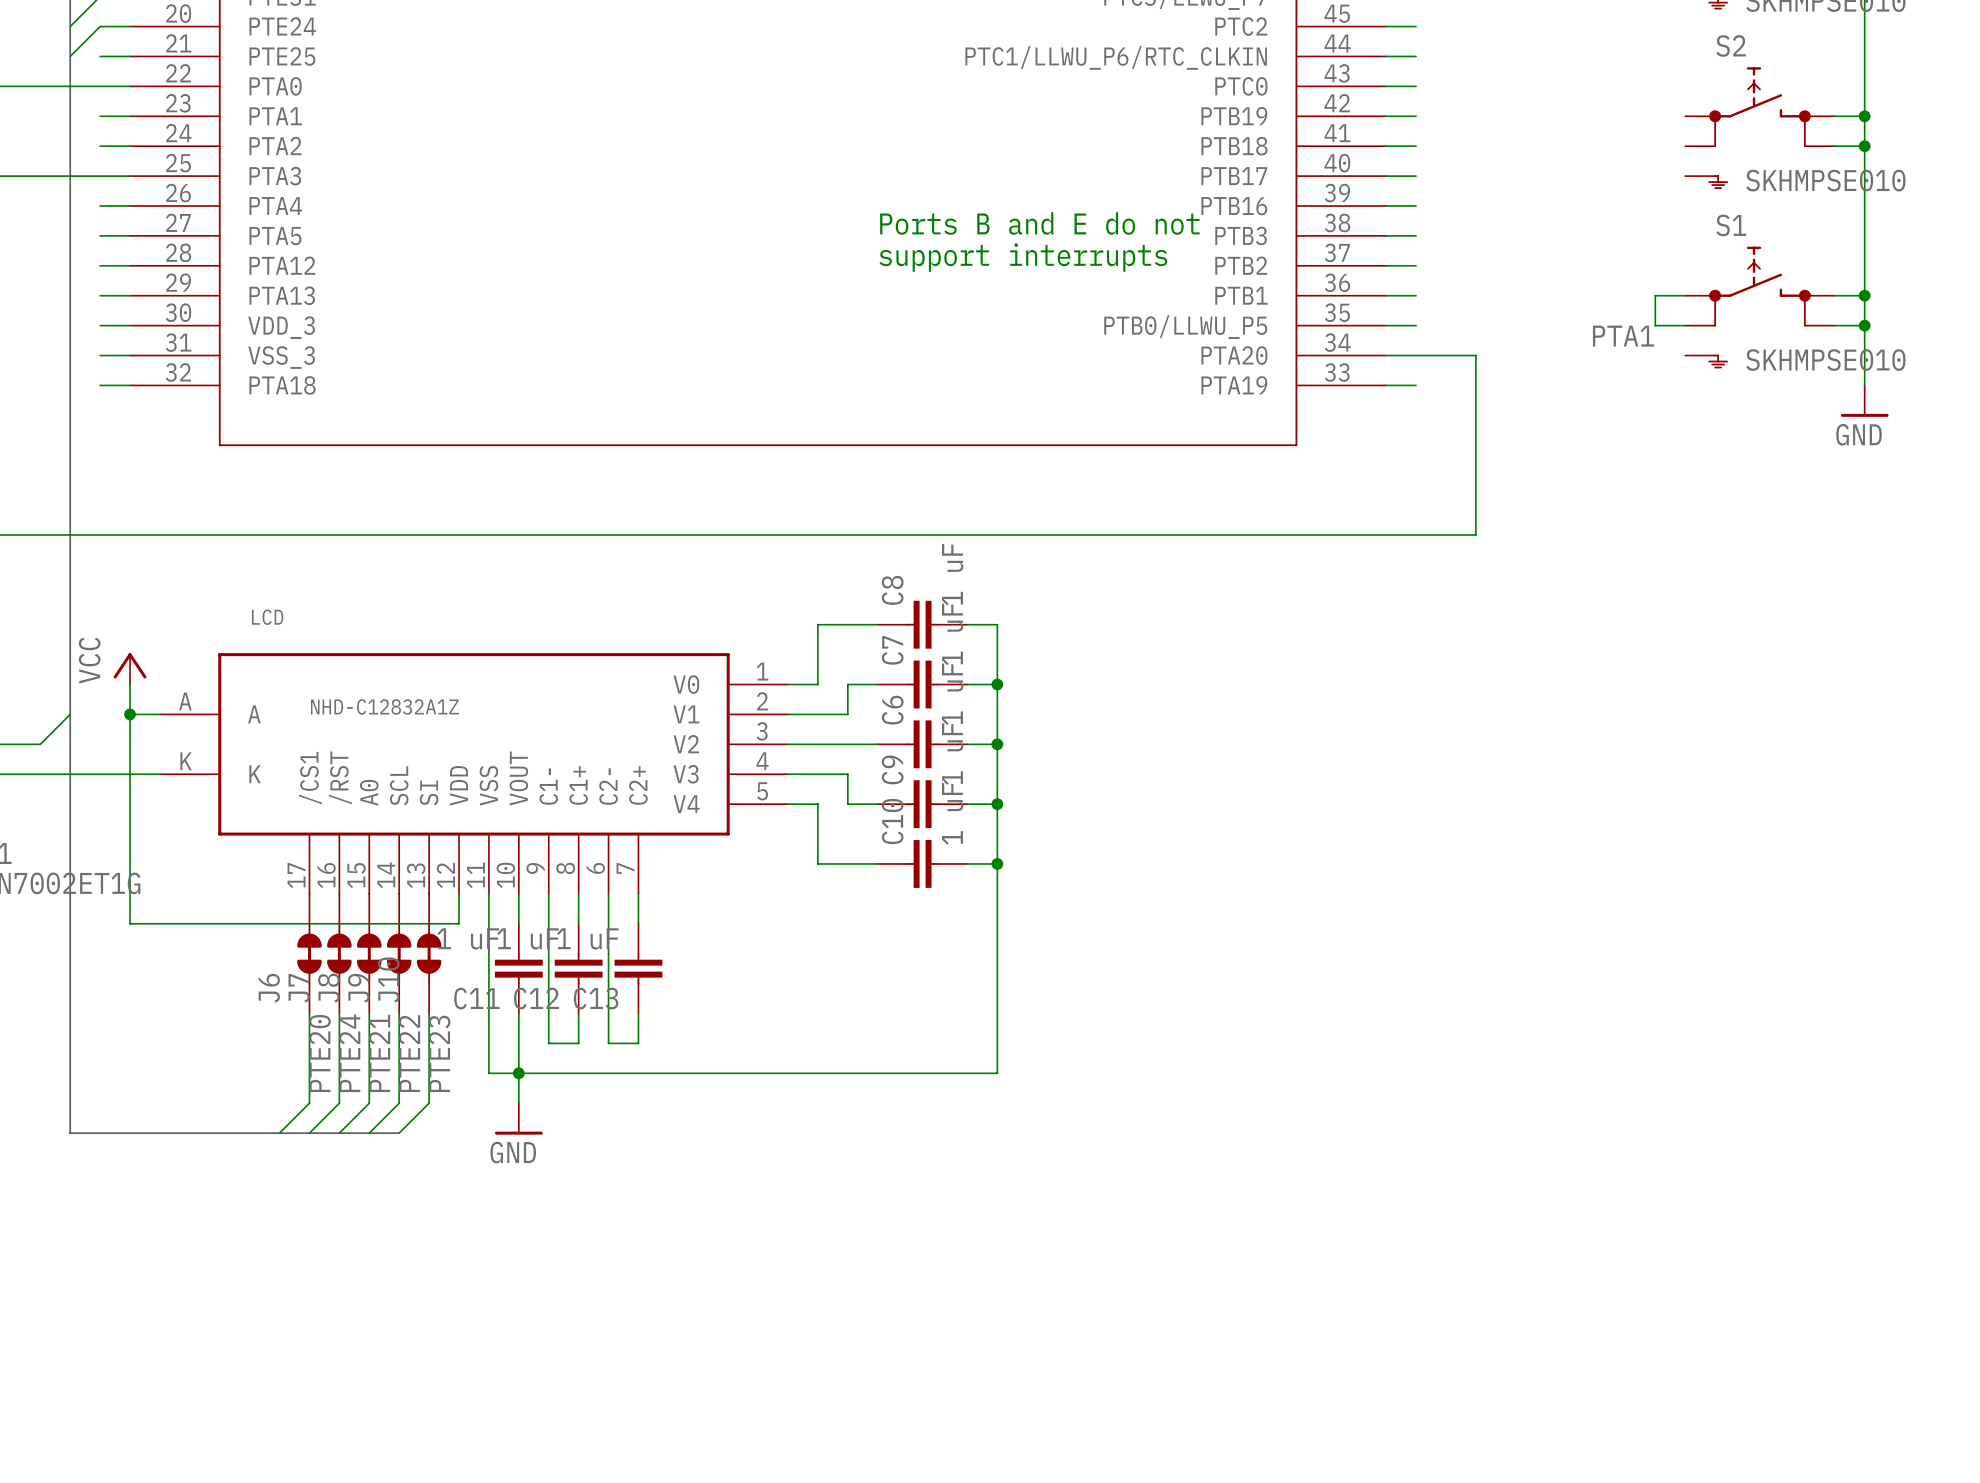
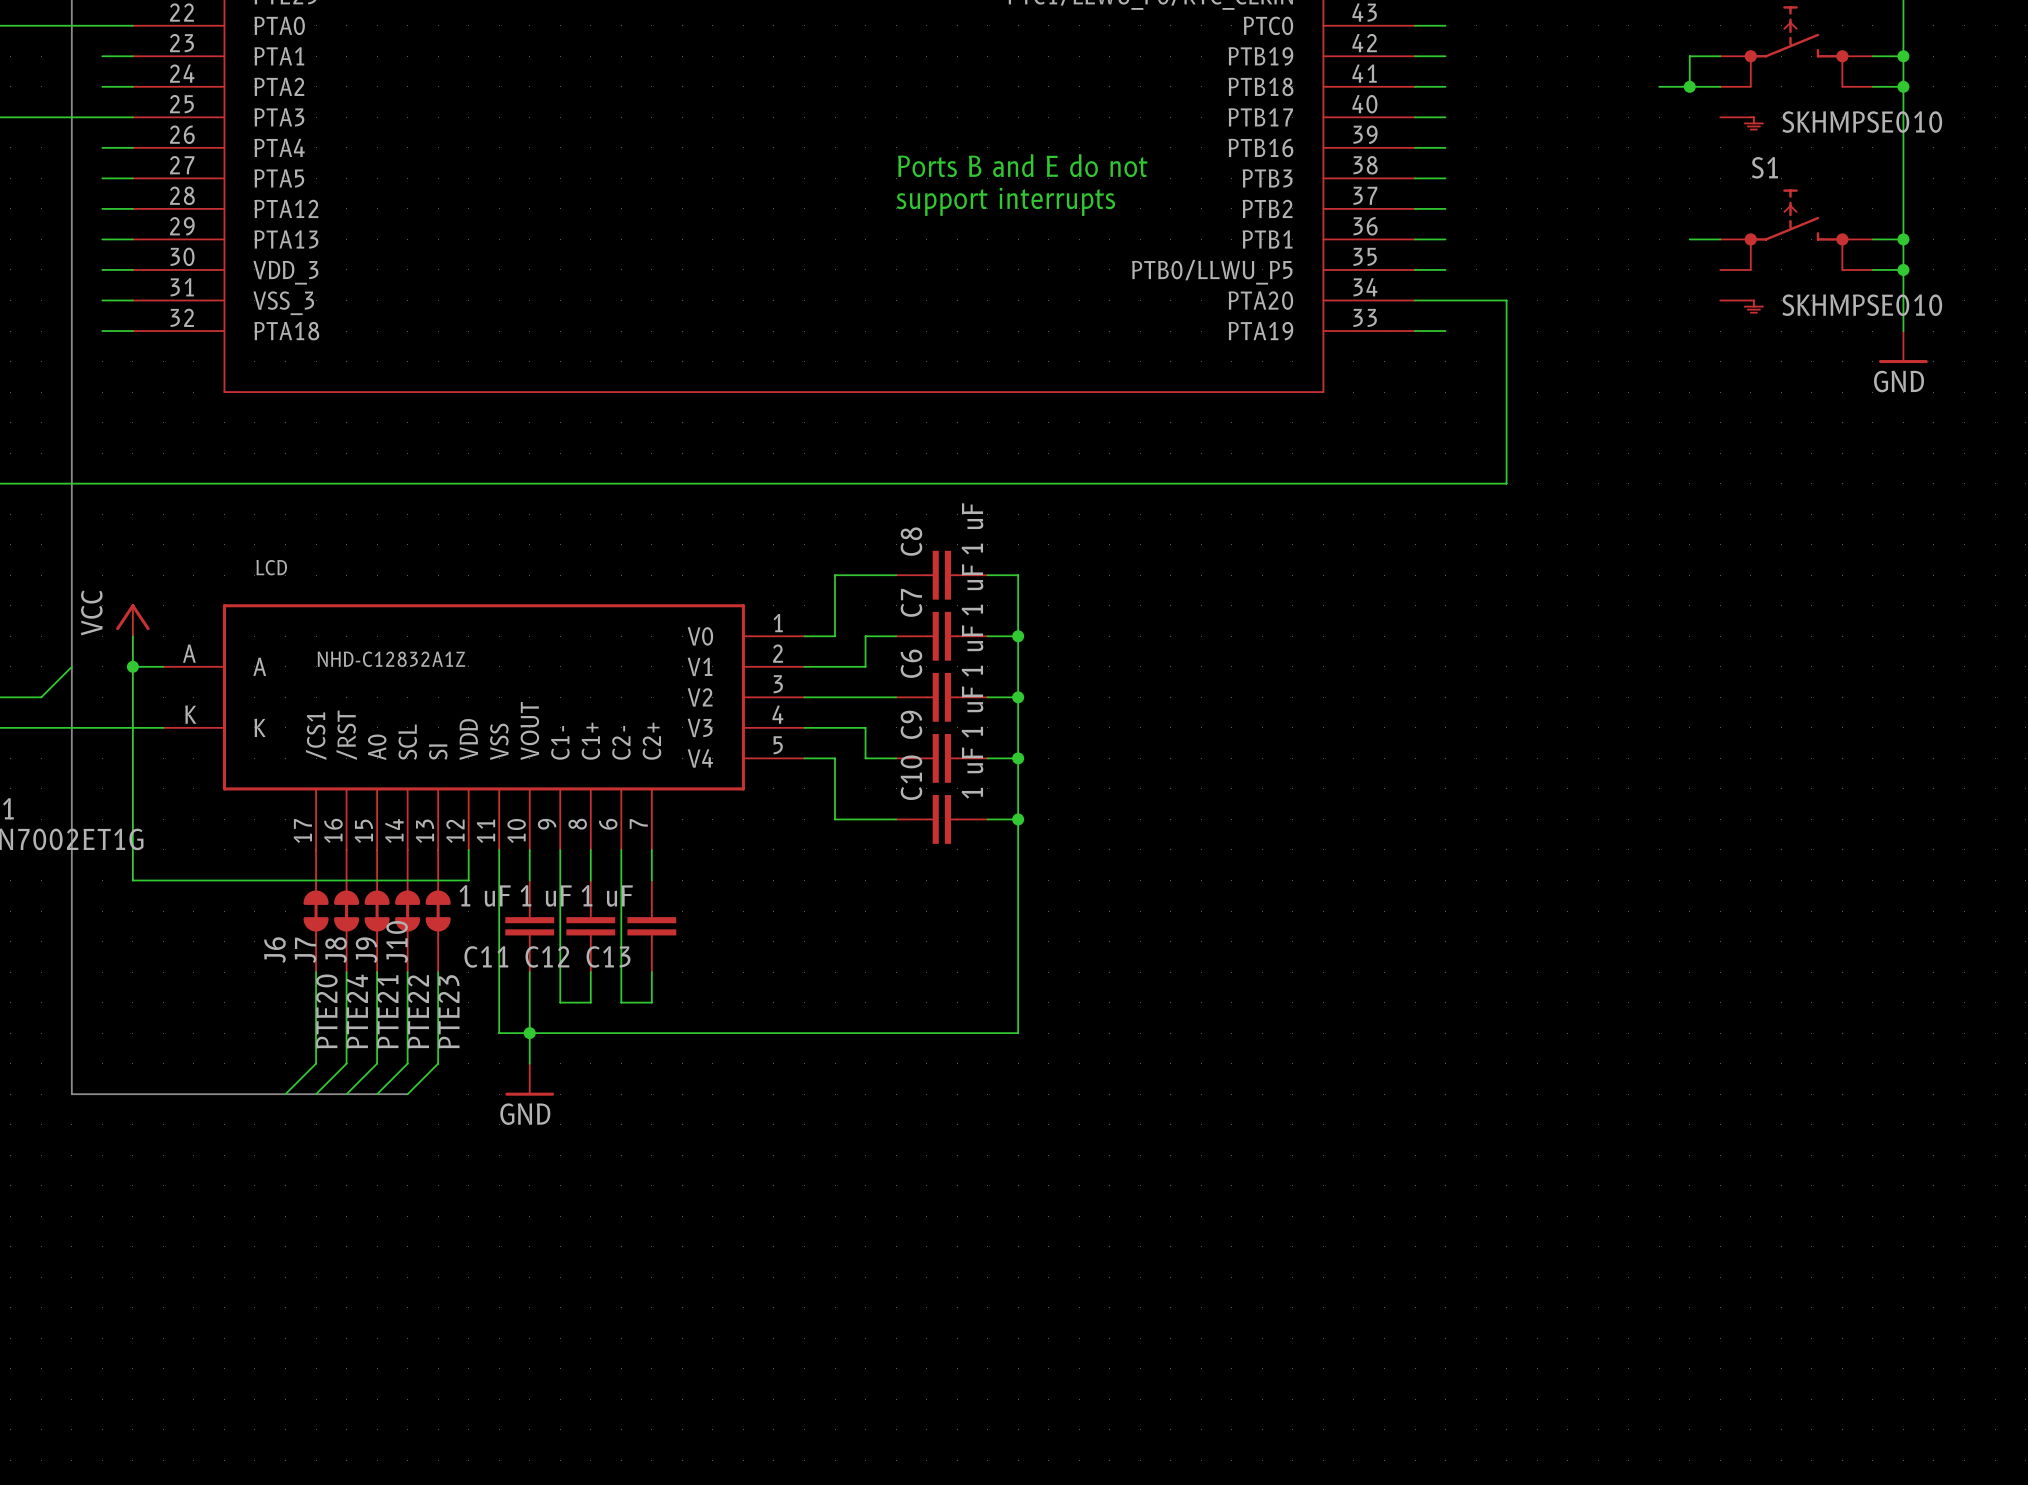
wire: none -> (1720, 56) (1689, 56) (1689, 86)
wire: none -> (1659, 86) (1720, 86)
junction: none -> (1689, 86)
wire: (1655, 295) (1655, 325) (1685, 325) -> none
label: PTA1 (1623, 336) -> none

